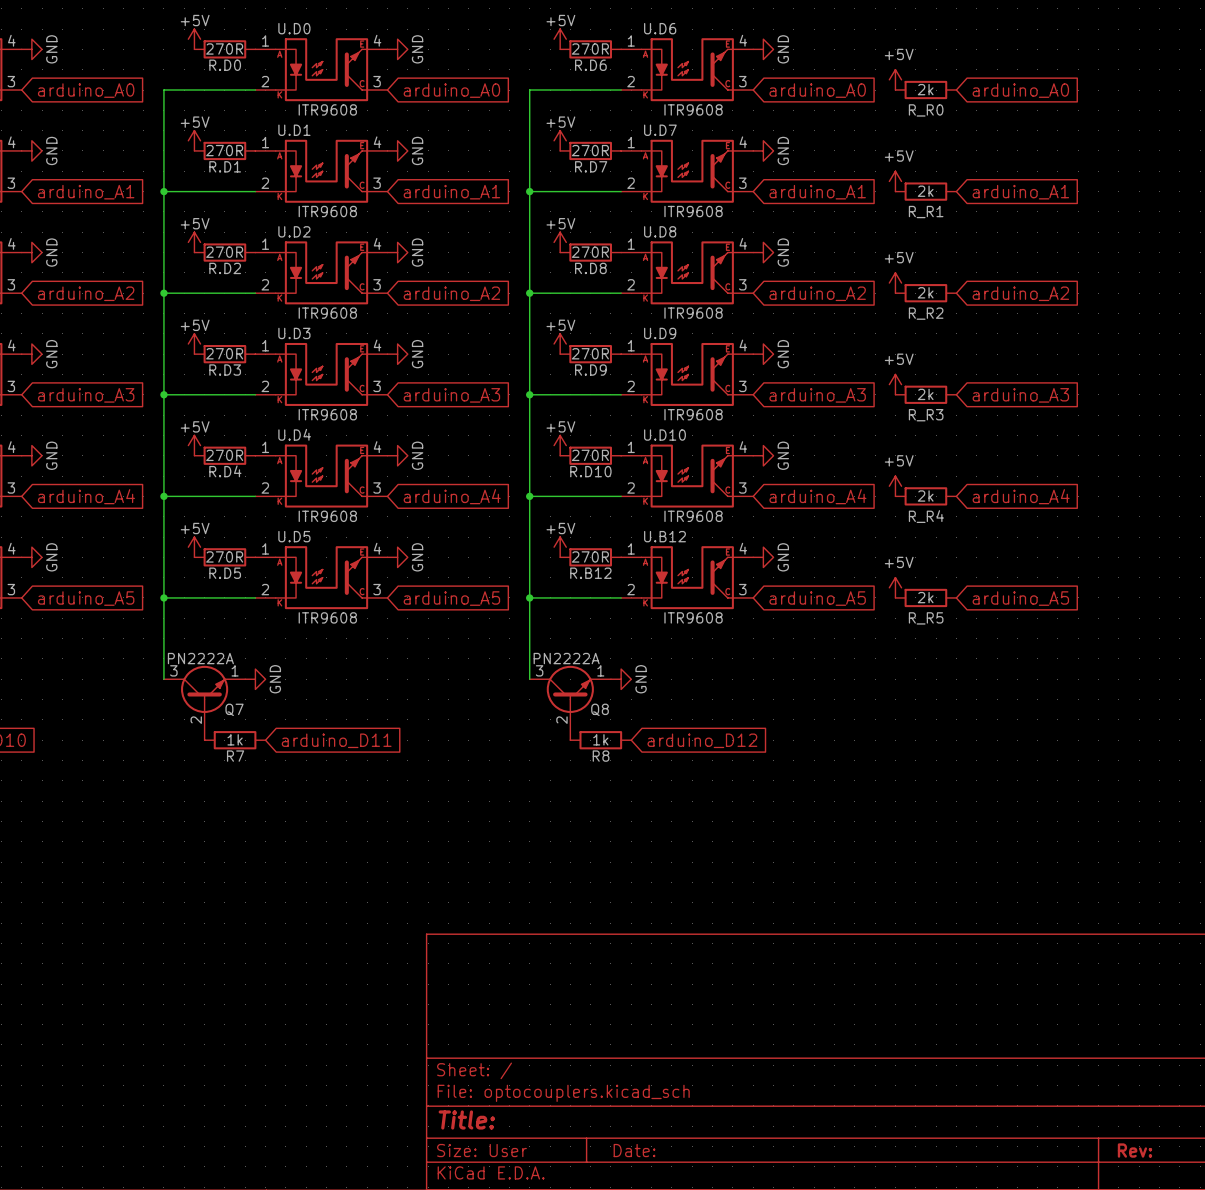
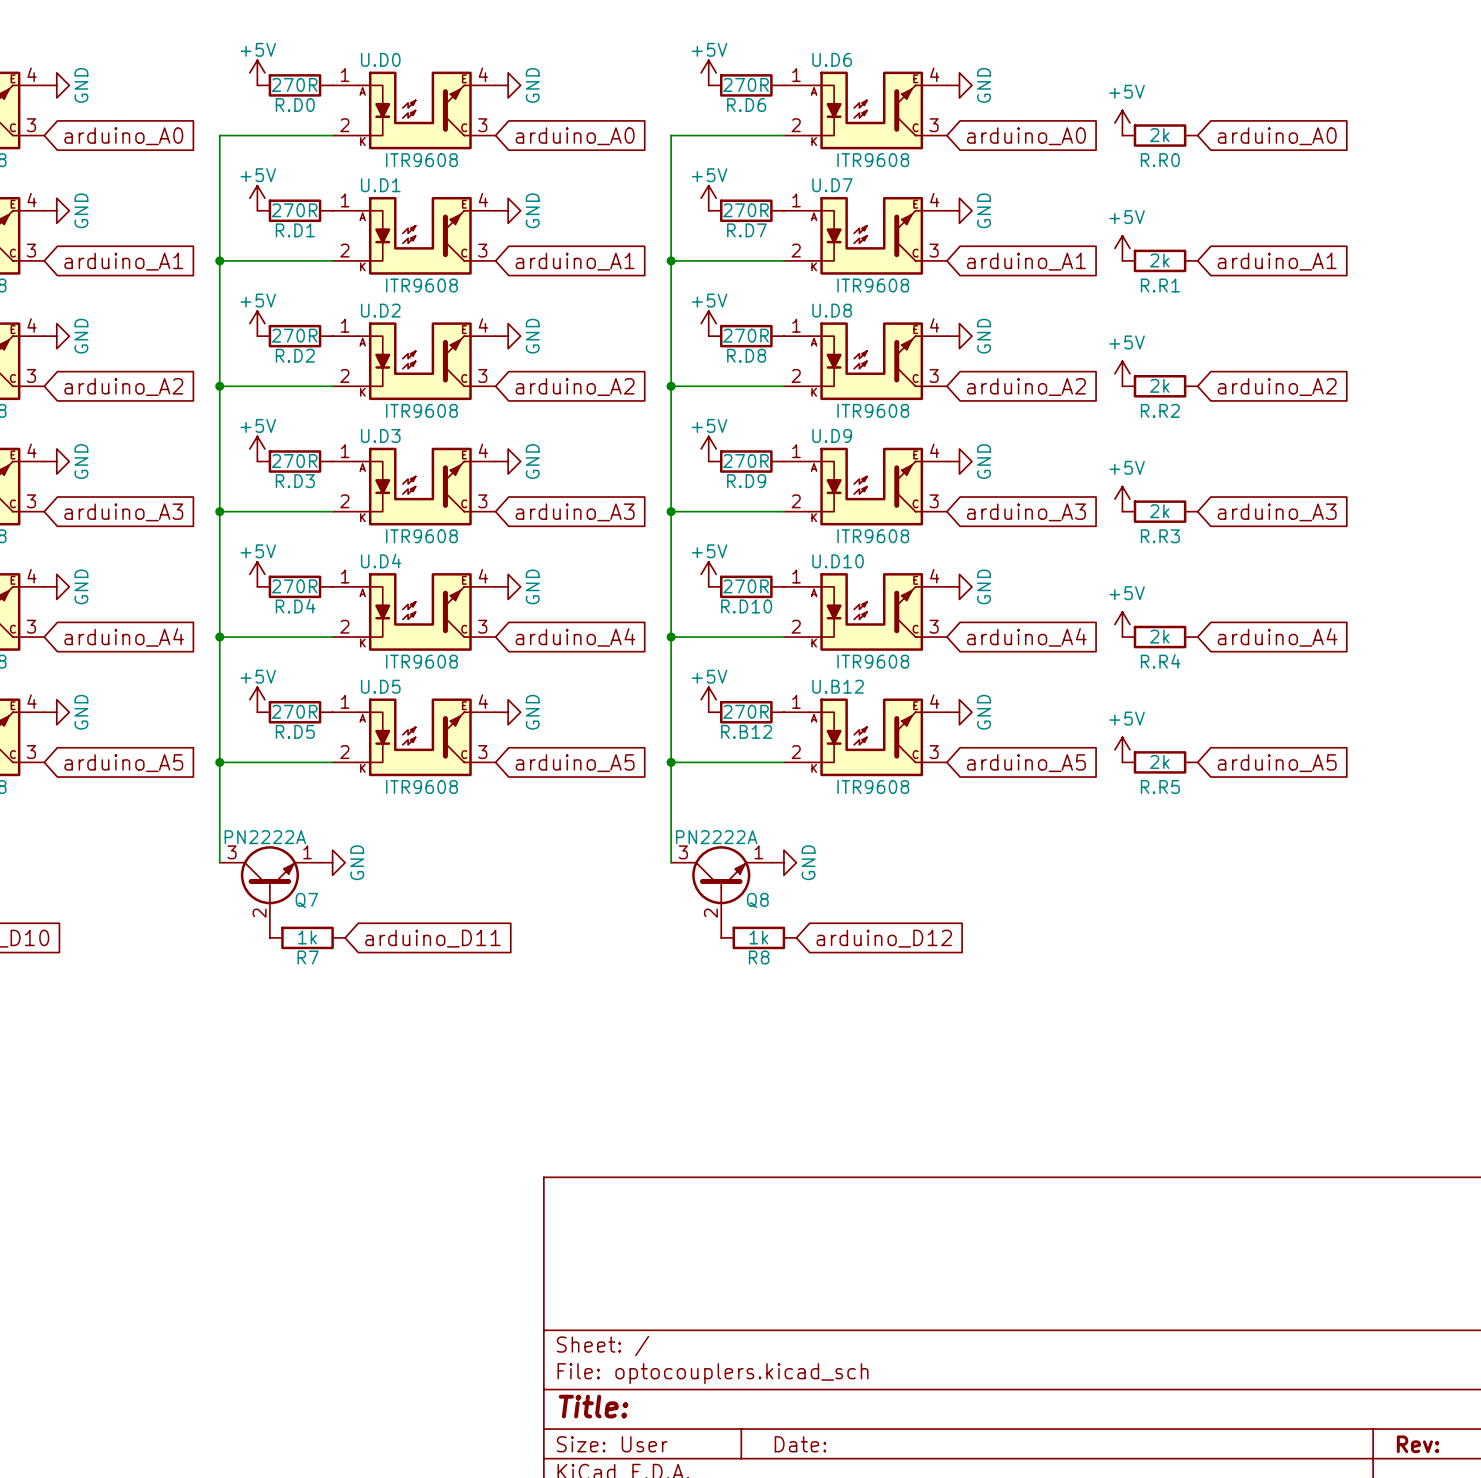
R_R0 name: R_R0 (926, 110) -> R.R0 (1160, 160)
R_R1 name: R_R1 (926, 212) -> R.R1 (1160, 285)
R_R2 name: R_R2 (926, 313) -> R.R2 (1160, 410)
R_R3 name: R_R3 (926, 415) -> R.R3 (1160, 536)
R_R4 name: R_R4 (926, 516) -> R.R4 (1160, 661)
R_R5 name: R_R5 (926, 618) -> R.R5 (1160, 787)

